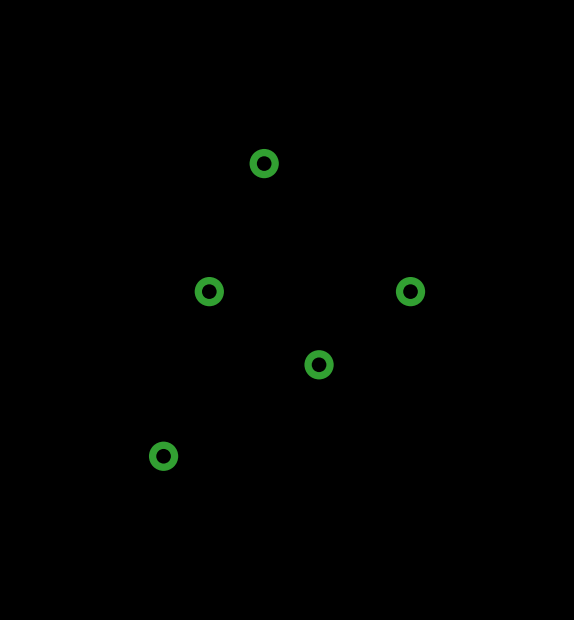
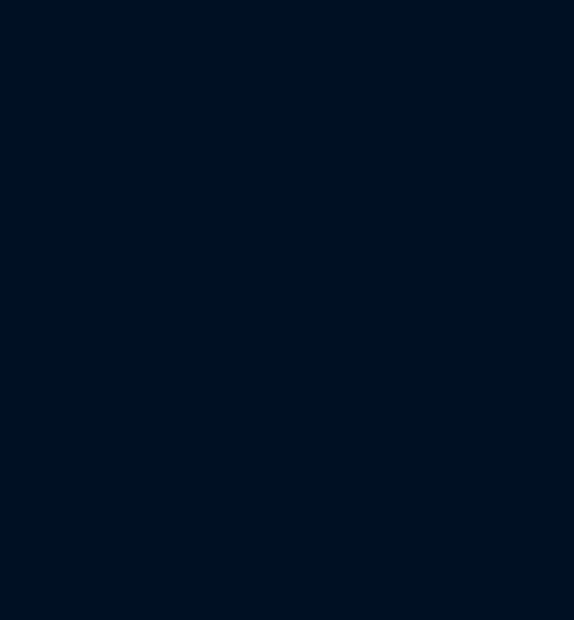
via: (264, 163) -> none
via: (209, 291) -> none
via: (410, 291) -> none
via: (319, 364) -> none
via: (163, 456) -> none

